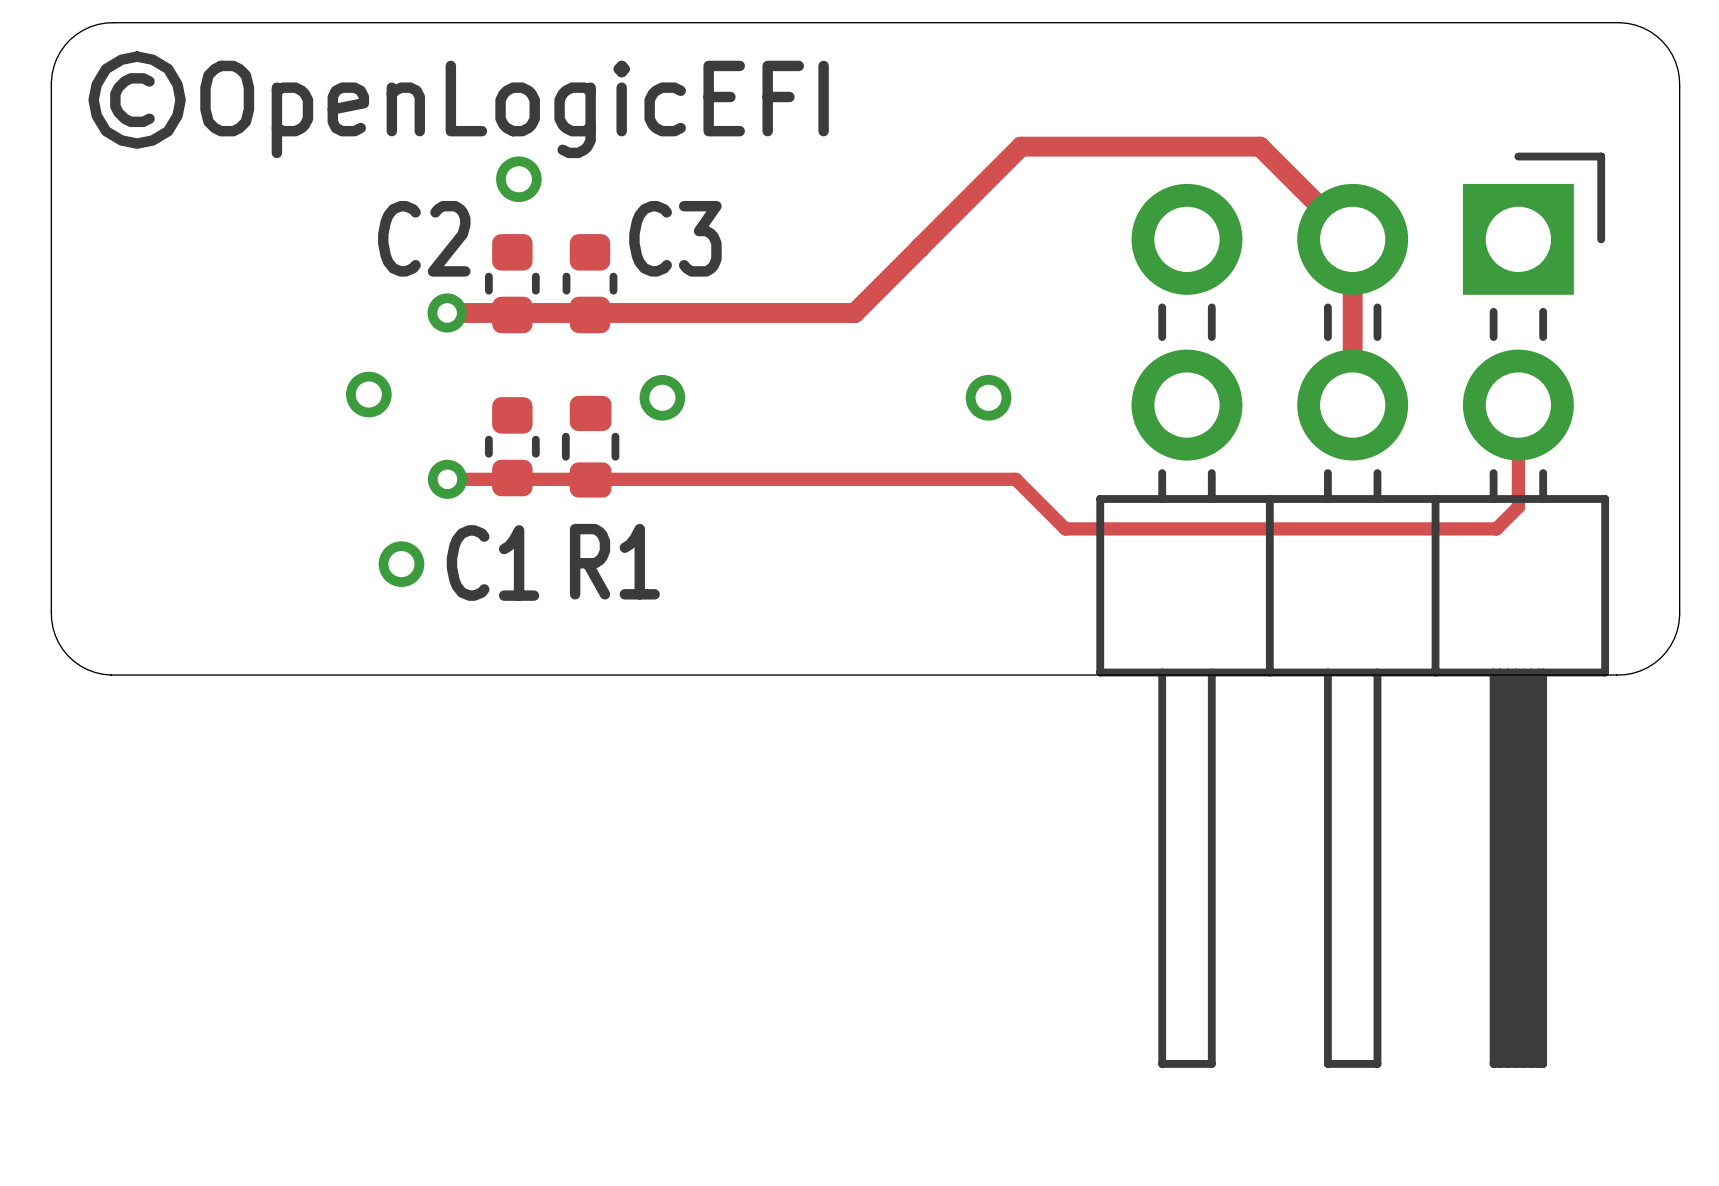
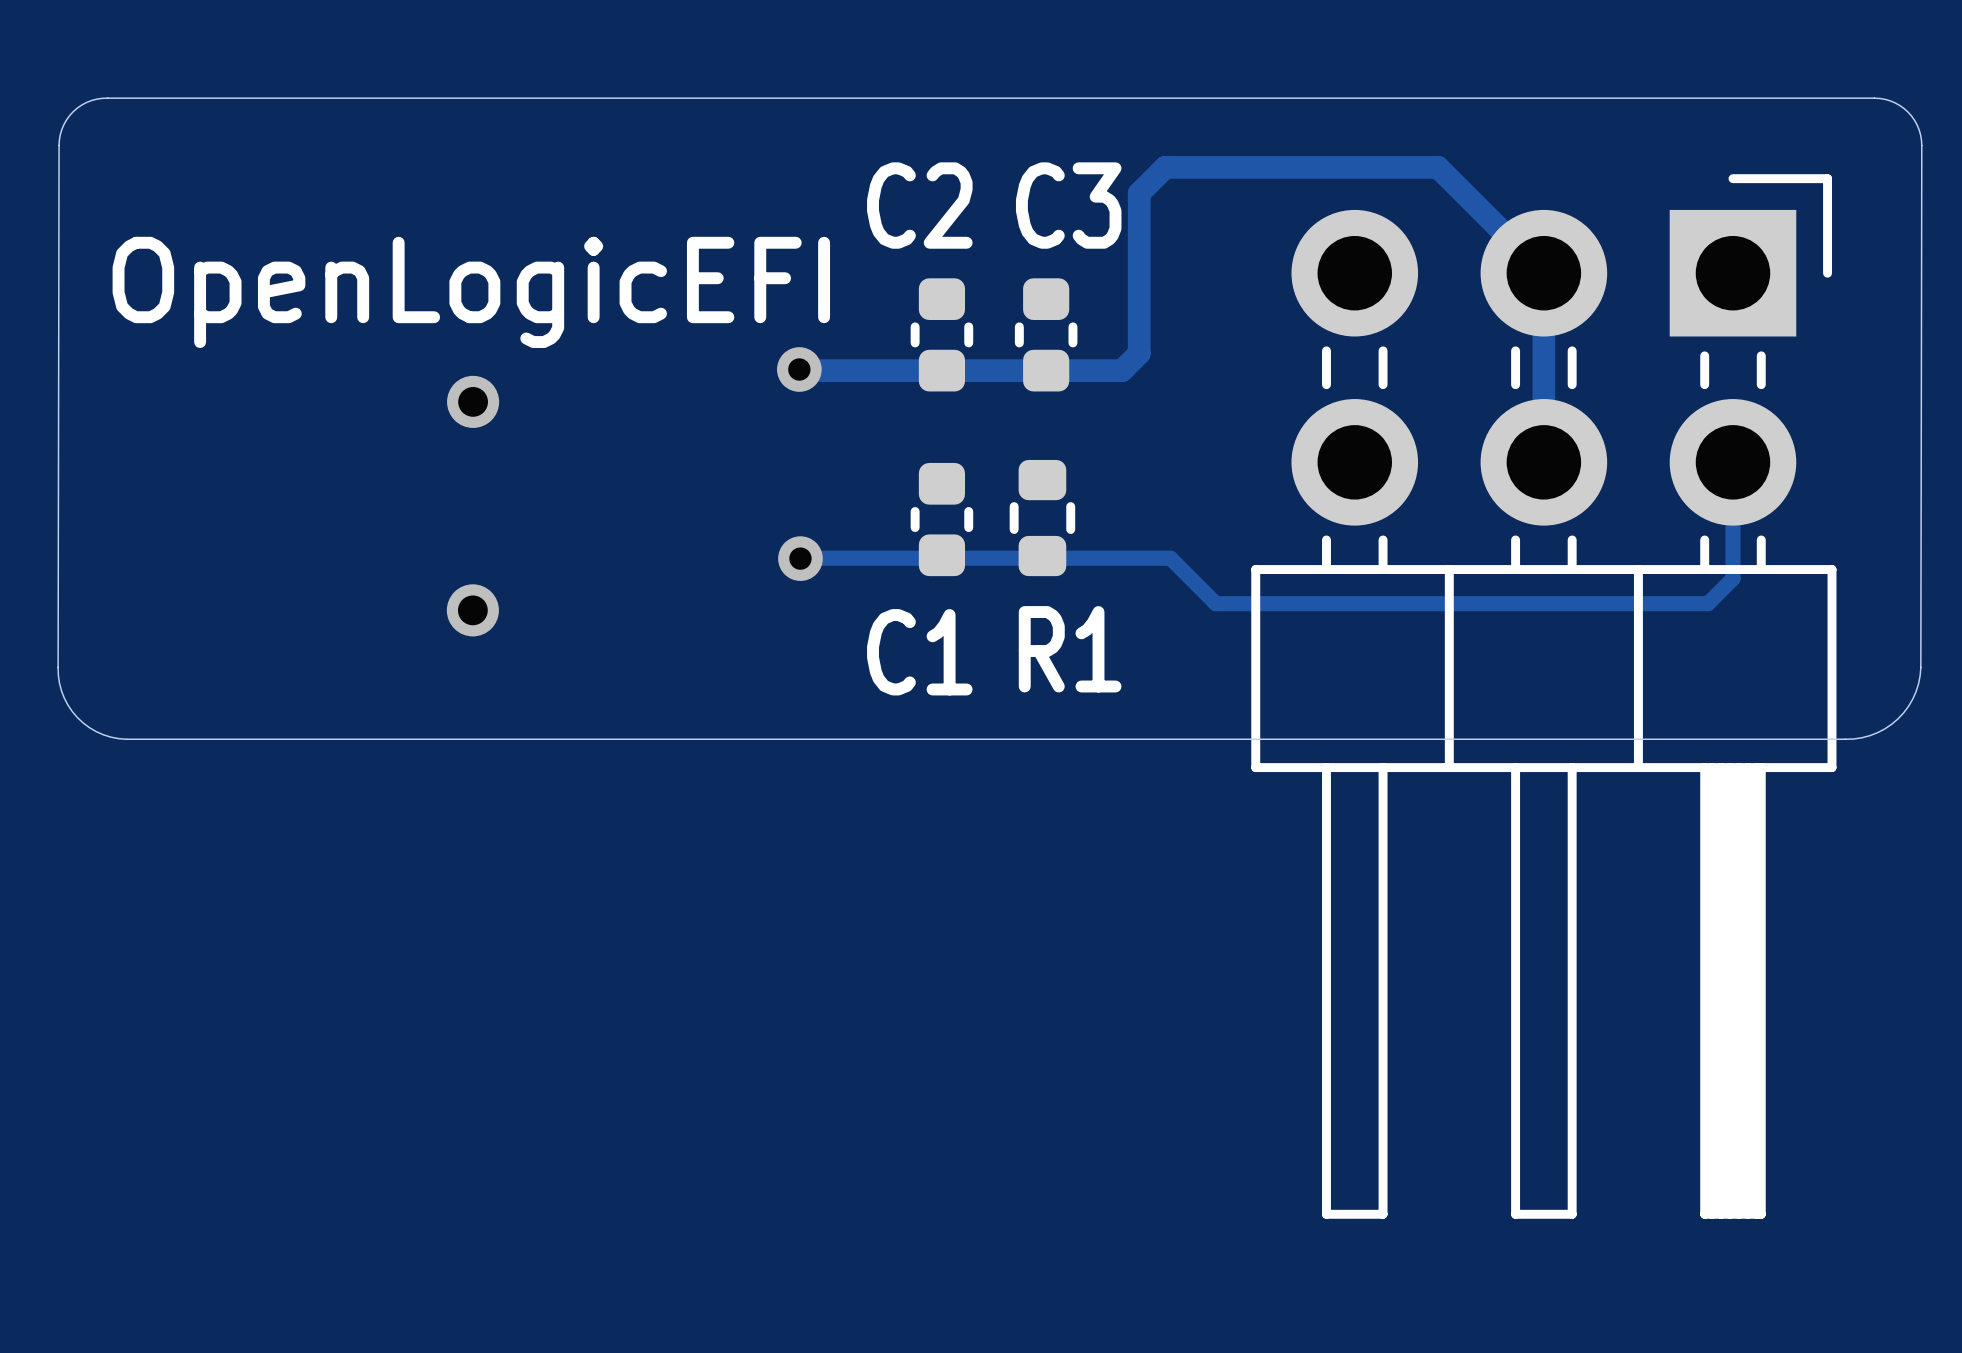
board edge: (114, 22) (1620, 22) (1643, 28) (1656, 36) (1668, 48) (1675, 62) (1679, 77) (1679, 615) (1674, 638) (1665, 652) (1654, 663) (1640, 670) (1616, 675) (110, 675) (87, 669) (74, 661) (62, 649) (55, 635) (51, 620) (51, 82) (56, 59) (70, 39) (90, 26) (114, 22) -> (126, 739) (103, 734) (82, 722) (67, 704) (61, 690) (58, 675) (59, 140) (63, 124) (69, 115) (77, 107) (91, 100) (107, 98) (1874, 98) (1890, 100) (1903, 108) (1914, 120) (1919, 129) (1921, 145) (1920, 667) (1918, 683) (1908, 706) (1891, 724) (1869, 735) (1845, 739) (126, 739)
text: ©OpenLogicEFI (458, 104) -> none
track: (998, 169) (854, 312) (447, 312) -> (1139, 193) (1139, 353) (1122, 370) (800, 370) (800, 368)
via: (518, 179) -> none
C2 name position: C2 (424, 238) -> C2 (919, 205)
C3 name position: C3 (675, 238) -> C3 (1068, 205)
text: none -> OpenLogicEFI (471, 292)
C2 position: (512, 283) -> (941, 334)
C3 position: (589, 283) -> (1046, 334)
via: (447, 312) -> none
via: none -> (799, 369)
via position: (368, 394) -> (473, 401)
via: (662, 397) -> none
via: (988, 397) -> none
C1 position: (512, 446) -> (941, 519)
R1 position: (590, 446) -> (1042, 518)
track: (447, 479) (1015, 479) (1025, 489) -> (800, 558) (1170, 558)
via: (447, 479) -> none
via: none -> (800, 558)
via position: (401, 564) -> (472, 610)

